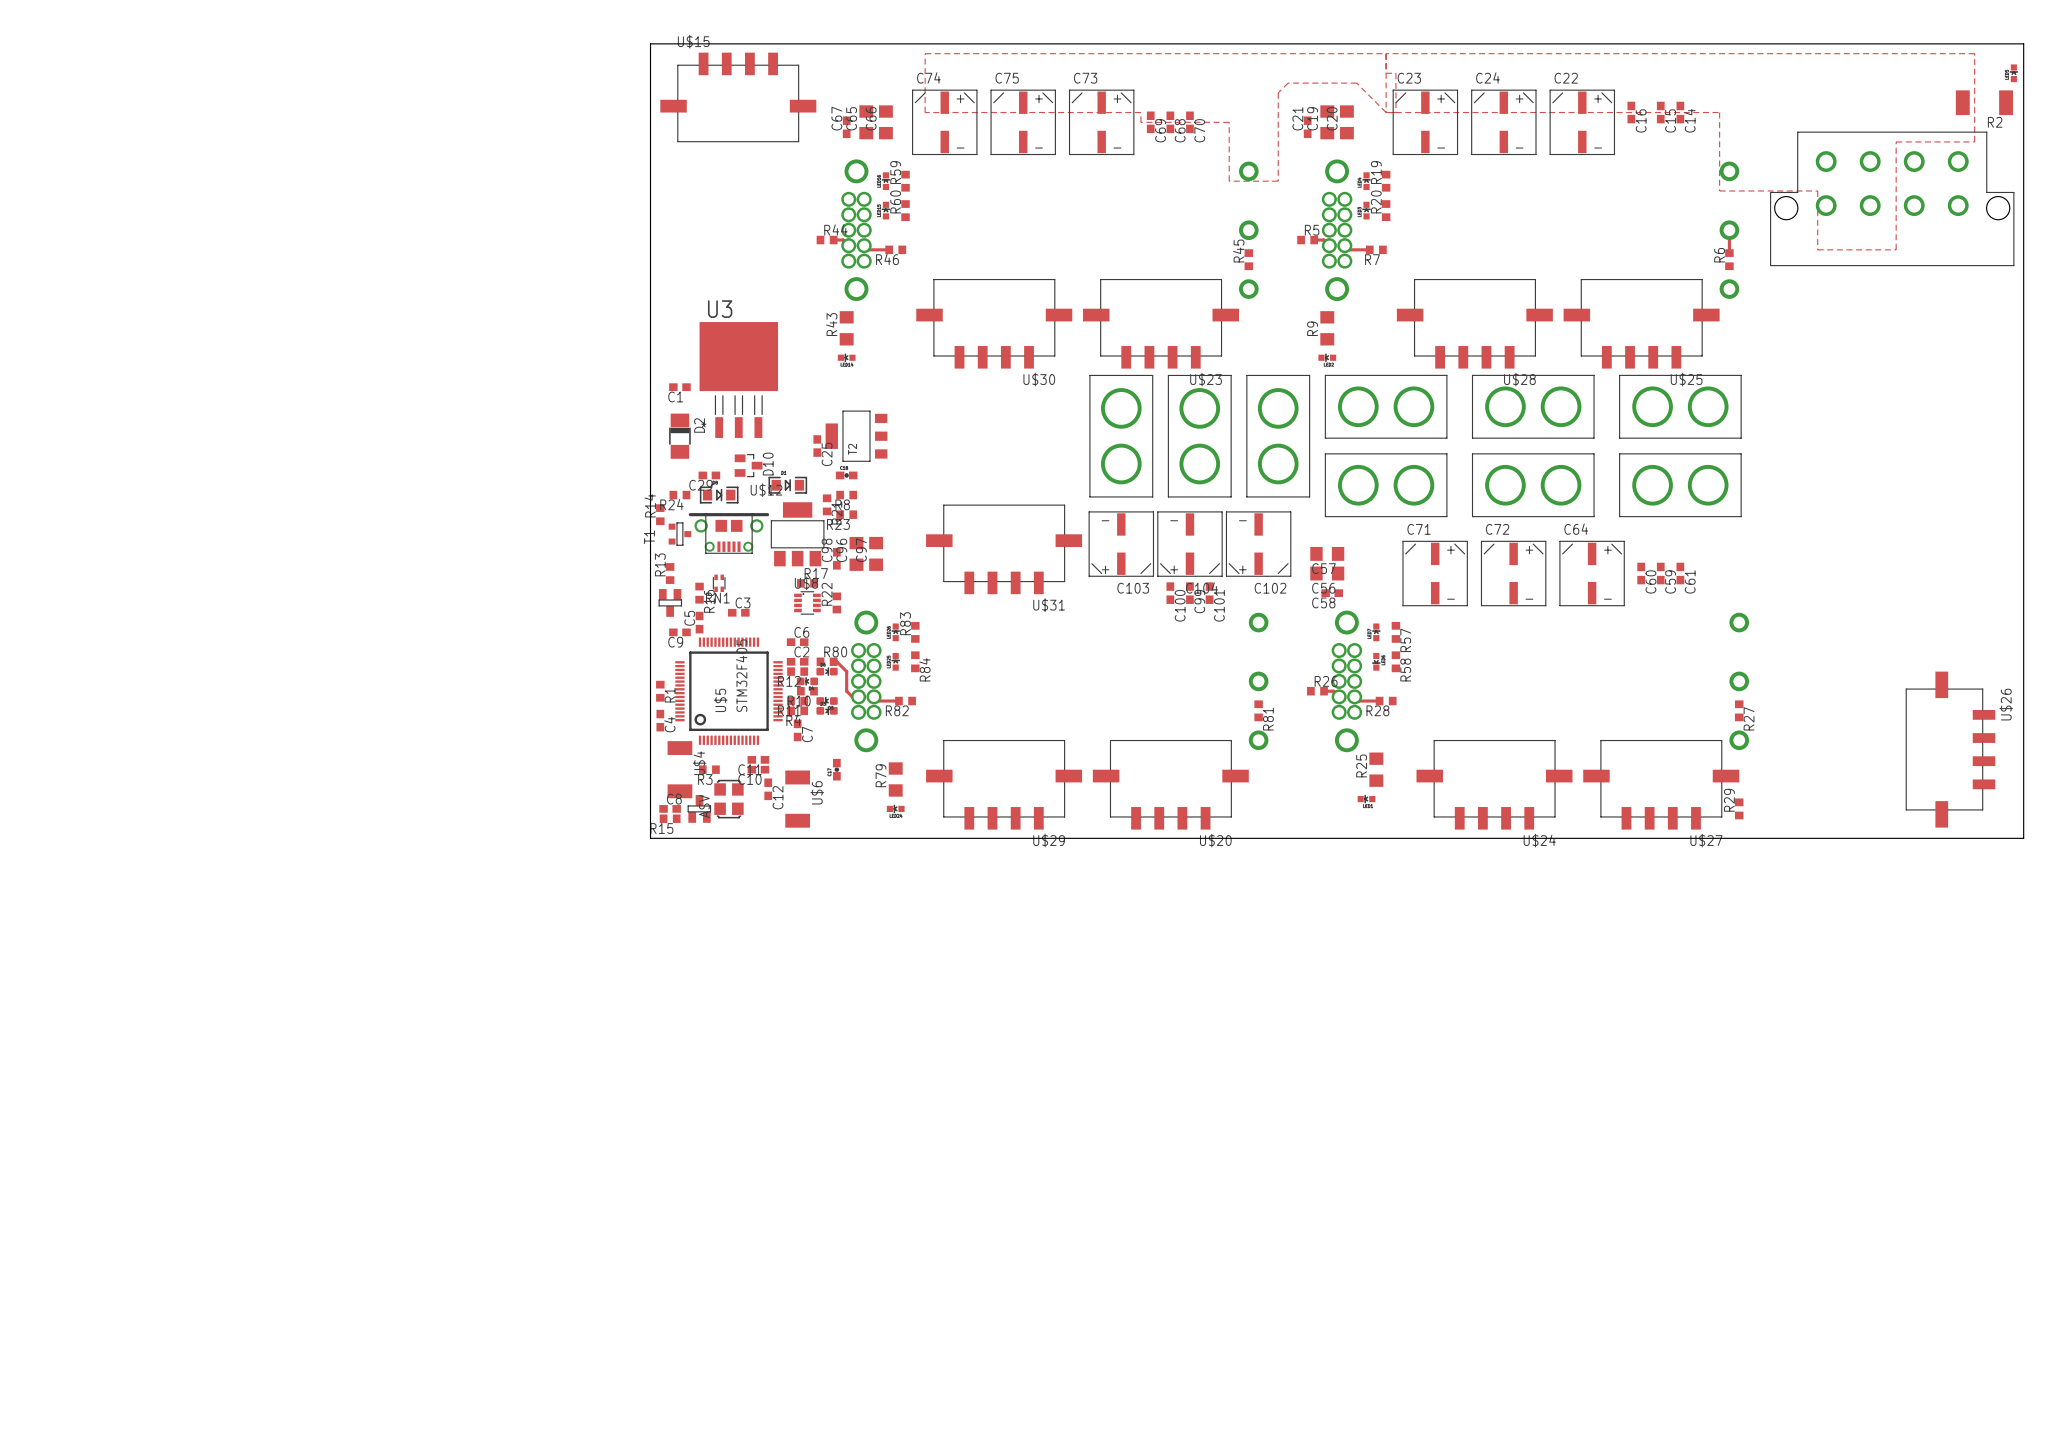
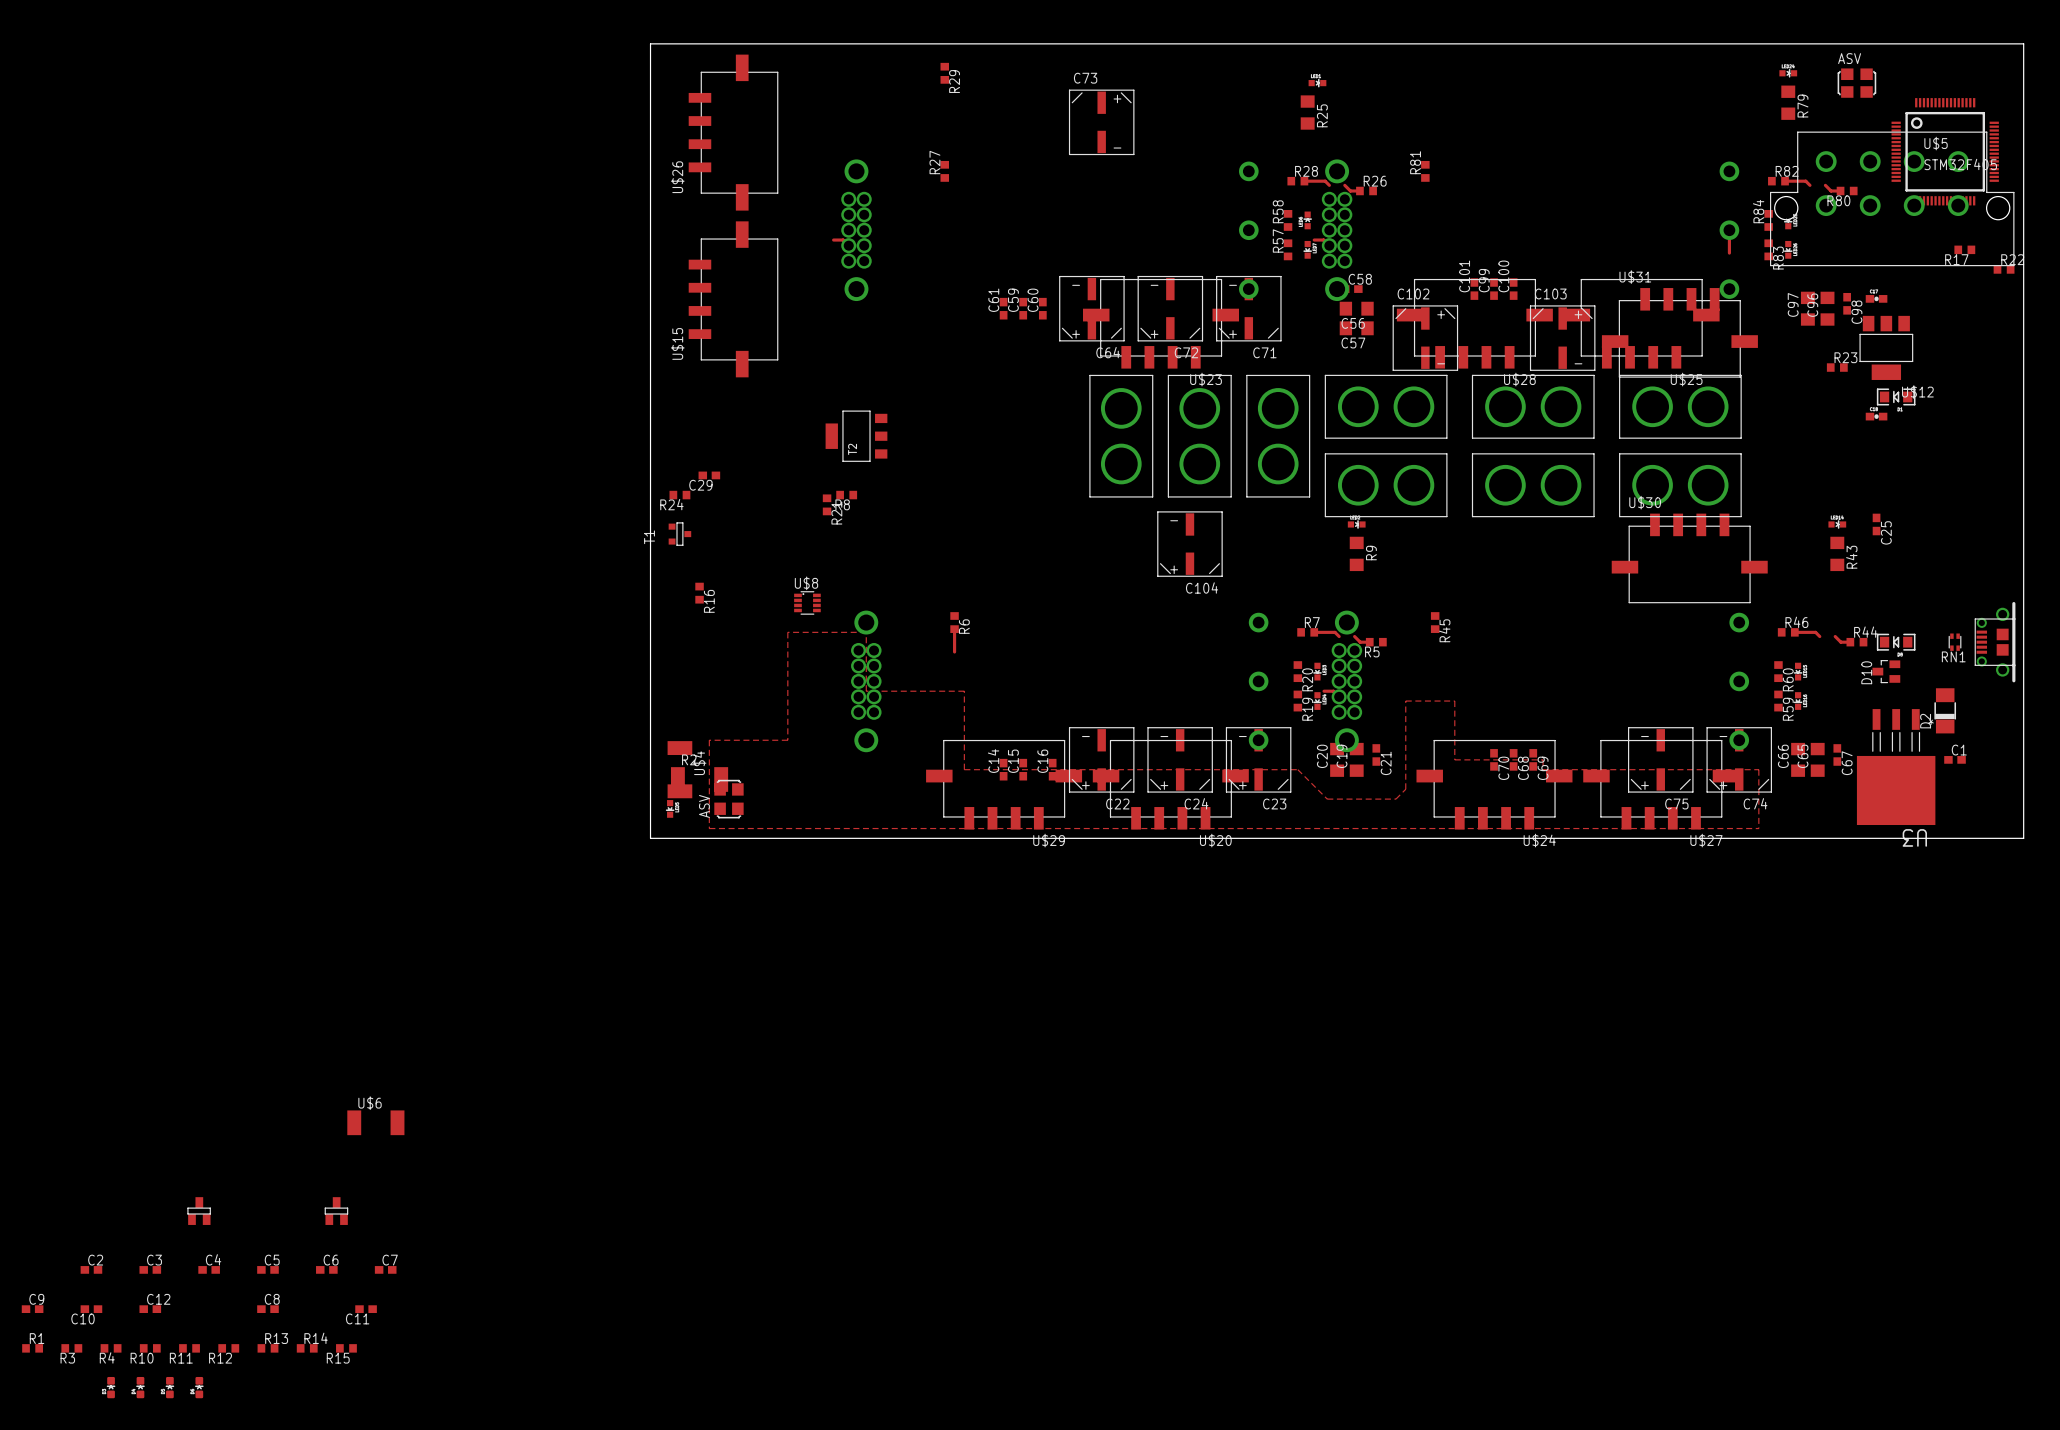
zone outline: (1386, 53) (1386, 112) -> none
zone outline: (1386, 73) (1395, 73) (1395, 112) -> none
part rotation: 0° (2013, 73) -> 180° (670, 808)
part position: (2013, 73) -> (670, 808)
C74 name position: C74 (928, 77) -> C74 (1755, 803)
C24 name position: C24 (1487, 77) -> C24 (1196, 803)
C75 name position: C75 (1007, 78) -> C75 (1676, 804)
C23 name position: C23 (1409, 78) -> C23 (1274, 804)
C22 name position: C22 (1566, 78) -> C22 (1117, 804)
ASV: none -> (1856, 83)
C74 footprint: [912, 89, 978, 156] -> [1706, 727, 1772, 793]
C75 footprint: [990, 89, 1056, 156] -> [1628, 727, 1694, 793]
C23 footprint: [1392, 89, 1459, 156] -> [1225, 727, 1292, 793]
C24 footprint: [1471, 89, 1537, 156] -> [1147, 727, 1213, 793]
C22 footprint: [1549, 89, 1615, 156] -> [1069, 727, 1135, 793]
U$15 rotation: 0° (738, 97) -> 90° counterclockwise (733, 299)
U$15 position: (738, 97) -> (733, 299)
R2 position: (1984, 102) -> (699, 779)
zone outline: (1386, 112) (1719, 112) (1719, 190) (1817, 190) (1817, 249) (1896, 249) (1896, 141) (1974, 141) (1974, 53) (925, 53) (925, 112) (1140, 112) (1140, 122) (1229, 122) (1229, 181) (1278, 181) (1278, 92) (1288, 83) (1356, 83) (1386, 112) -> none
C16 position: (1631, 112) -> (1052, 769)
C15 position: (1660, 112) -> (1023, 769)
C14 position: (1680, 112) -> (1003, 769)
C67 name position: C67 (836, 118) -> C67 (1847, 763)
C21 name position: C21 (1297, 118) -> C21 (1386, 763)
C16 name position: C16 (1641, 120) -> C16 (1042, 761)
C15 name position: C15 (1670, 120) -> C15 (1013, 761)
C14 name position: C14 (1689, 120) -> C14 (993, 761)
C65 position: (866, 122) -> (1817, 759)
C66 position: (885, 122) -> (1798, 759)
C69 position: (1150, 122) -> (1533, 759)
C68 position: (1170, 122) -> (1513, 759)
C70 position: (1189, 122) -> (1494, 759)
C19 position: (1327, 122) -> (1356, 759)
C20 position: (1346, 122) -> (1337, 759)
R2 name position: R2 (1995, 122) -> R2 (689, 759)
C67 position: (846, 127) -> (1837, 754)
C21 position: (1307, 127) -> (1376, 754)
R59 name position: R59 (895, 172) -> R59 (1788, 709)
R19 name position: R19 (1376, 172) -> R19 (1307, 709)
part rotation: 0° (885, 181) -> 180° (1798, 701)
part position: (885, 181) -> (1798, 701)
R59 position: (905, 181) -> (1778, 701)
track: none -> (1304, 181) (1325, 181) (1329, 185)
part rotation: 0° (1366, 181) -> 180° (1317, 701)
part position: (1366, 181) -> (1317, 701)
R19 position: (1386, 181) -> (1297, 701)
track: none -> (1785, 181) (1805, 181) (1809, 185)
track: none -> (1344, 185) (1350, 190) (1359, 190)
track: none -> (1825, 185) (1831, 190) (1840, 190)
R60 name position: R60 (895, 201) -> R60 (1788, 679)
R20 name position: R20 (1376, 201) -> R20 (1307, 679)
part rotation: 0° (885, 210) -> 180° (1798, 671)
part position: (885, 210) -> (1798, 671)
R60 position: (905, 210) -> (1778, 671)
part rotation: 0° (1366, 210) -> 180° (1317, 671)
part position: (1366, 210) -> (1317, 671)
R20 position: (1386, 210) -> (1297, 671)
R5 name position: R5 (1312, 230) -> R5 (1372, 651)
R44 position: (827, 240) -> (1856, 642)
R5 position: (1307, 240) -> (1376, 642)
track: (864, 245) (868, 249) (889, 249) -> none
track: (1344, 245) (1348, 249) (1369, 249) -> none
R46 position: (895, 249) -> (1788, 632)
R7 position: (1376, 249) -> (1307, 632)
R45 name position: R45 (1238, 251) -> R45 (1444, 630)
R6 name position: R6 (1719, 255) -> R6 (964, 626)
R46 name position: R46 (887, 259) -> R46 (1796, 622)
R45 position: (1248, 259) -> (1435, 622)
R7 name position: R7 (1372, 259) -> R7 (1312, 622)
R6 position: (1729, 259) -> (954, 622)
U$30 rotation: 0° (994, 323) -> 180° (1689, 558)
U$30 position: (994, 323) -> (1689, 558)
R43 name position: R43 (831, 324) -> R43 (1851, 557)
R43 position: (846, 328) -> (1837, 553)
R9 name position: R9 (1312, 328) -> R9 (1371, 553)
R9 position: (1327, 328) -> (1356, 553)
part rotation: 0° (846, 357) -> 180° (1837, 524)
part position: (846, 357) -> (1837, 524)
part rotation: 0° (1327, 357) -> 180° (1356, 524)
part position: (1327, 357) -> (1356, 524)
U3 rotation: 0° (738, 380) -> 180° (1896, 767)
U3 position: (738, 380) -> (1896, 767)
C1 position: (679, 387) -> (1955, 759)
C1 name position: C1 (675, 396) -> C1 (1959, 750)
D2 rotation: 0° (679, 436) -> 180° (1945, 710)
D2 position: (679, 436) -> (1945, 710)
C25 position: (817, 446) -> (1876, 524)
D10 rotation: 0° (748, 465) -> 180° (1886, 671)
D10 position: (748, 465) -> (1886, 671)
part position: (846, 475) -> (1876, 416)
part rotation: 0° (787, 485) -> 180° (1896, 396)
part position: (787, 485) -> (1896, 396)
part rotation: 0° (719, 495) -> 180° (1896, 642)
part position: (719, 495) -> (1896, 642)
C103 footprint: [1088, 511, 1154, 577] -> [1530, 305, 1596, 371]
C102 footprint: [1225, 511, 1292, 577] -> [1392, 305, 1459, 371]
R14 rotation: 0° (660, 514) -> 90° clockwise (307, 1348)
R14 position: (660, 514) -> (307, 1348)
R23 position: (846, 514) -> (1837, 367)
R23 name position: R23 (838, 524) -> R23 (1845, 357)
C71 name position: C71 (1419, 529) -> C71 (1264, 352)
C72 name position: C72 (1497, 529) -> C72 (1186, 352)
C64 name position: C64 (1576, 529) -> C64 (1108, 352)
part: (728, 533) -> none
U$12 rotation: 0° (797, 534) -> 180° (1886, 347)
U$12 position: (797, 534) -> (1886, 347)
C71 footprint: [1402, 540, 1468, 607] -> [1216, 276, 1282, 342]
C72 footprint: [1480, 540, 1547, 607] -> [1137, 276, 1204, 342]
C64 footprint: [1559, 540, 1625, 607] -> [1059, 276, 1125, 342]
U$31 rotation: 0° (1004, 549) -> 180° (1679, 332)
U$31 position: (1004, 549) -> (1679, 332)
C98 name position: C98 (827, 550) -> C98 (1856, 312)
C96 position: (856, 553) -> (1827, 308)
C97 position: (876, 553) -> (1807, 308)
C57 position: (1327, 553) -> (1356, 328)
C98 position: (836, 558) -> (1847, 303)
R13 rotation: 0° (670, 573) -> 90° clockwise (267, 1348)
R13 position: (670, 573) -> (267, 1348)
R17 name position: R17 (816, 573) -> R17 (1956, 259)
C56 position: (1327, 573) -> (1356, 308)
C60 position: (1641, 573) -> (1042, 308)
C59 position: (1660, 573) -> (1023, 308)
C61 position: (1680, 573) -> (1003, 308)
C60 name position: C60 (1650, 581) -> C60 (1033, 300)
C59 name position: C59 (1670, 581) -> C59 (1013, 300)
C61 name position: C61 (1690, 581) -> C61 (993, 300)
RN1 position: (719, 583) -> (1955, 642)
R17 position: (807, 583) -> (1964, 249)
C103 name position: C103 (1133, 588) -> C103 (1550, 293)
C102 name position: C102 (1270, 588) -> C102 (1413, 293)
C100 position: (1170, 593) -> (1513, 289)
C99 position: (1189, 593) -> (1494, 289)
C101 position: (1209, 593) -> (1474, 289)
C58 position: (1332, 593) -> (1351, 289)
C99 name position: C99 (1199, 601) -> C99 (1484, 280)
part: (670, 602) -> none
R22 rotation: 0° (836, 602) -> 90° clockwise (2004, 269)
R22 position: (836, 602) -> (2004, 269)
C58 name position: C58 (1323, 602) -> C58 (1360, 279)
C100 name position: C100 (1180, 605) -> C100 (1503, 276)
C101 name position: C101 (1219, 605) -> C101 (1464, 276)
C3 position: (738, 612) -> (150, 1269)
C5 rotation: 0° (699, 622) -> 90° clockwise (267, 1269)
C5 position: (699, 622) -> (267, 1269)
R83 name position: R83 (905, 623) -> R83 (1778, 258)
track: none -> (954, 629) (954, 651)
C9 position: (679, 632) -> (32, 1309)
zone outline: none -> (787, 632) (787, 740) (709, 740) (709, 828) (1758, 828) (1758, 769) (1543, 769) (1543, 759) (1454, 759) (1454, 701) (1405, 701) (1405, 789) (1395, 799) (1327, 799) (1297, 769) (964, 769) (964, 691) (866, 691) (866, 632) (787, 632)
part rotation: 0° (895, 632) -> 180° (1788, 249)
part position: (895, 632) -> (1788, 249)
R83 position: (915, 632) -> (1768, 249)
track: none -> (1314, 632) (1335, 632) (1339, 636)
part rotation: 0° (1376, 632) -> 180° (1307, 249)
part position: (1376, 632) -> (1307, 249)
R57 position: (1395, 632) -> (1288, 249)
track: none -> (1794, 632) (1815, 632) (1819, 636)
track: none -> (1354, 636) (1360, 642) (1369, 642)
track: none -> (1835, 636) (1840, 642) (1850, 642)
R57 name position: R57 (1405, 640) -> R57 (1278, 240)
C9 name position: C9 (675, 642) -> C9 (36, 1299)
C6 position: (797, 642) -> (326, 1269)
part: none -> (1995, 642)
R80 name position: R80 (835, 651) -> R80 (1838, 200)
C2 position: (797, 661) -> (91, 1269)
R80 position: (827, 661) -> (1847, 190)
track: (833, 661) (836, 661) (846, 671) (846, 691) (852, 696) (858, 696) -> none
part rotation: 0° (895, 661) -> 180° (1788, 220)
part position: (895, 661) -> (1788, 220)
R84 position: (915, 661) -> (1768, 220)
part rotation: 0° (1376, 661) -> 180° (1307, 220)
part position: (1376, 661) -> (1307, 220)
R58 position: (1395, 661) -> (1288, 220)
R84 name position: R84 (924, 669) -> R84 (1758, 211)
R58 name position: R58 (1405, 670) -> R58 (1278, 211)
R12 position: (797, 671) -> (228, 1348)
part rotation: 0° (827, 671) -> 90° counterclockwise (199, 1387)
part position: (827, 671) -> (199, 1387)
part rotation: 0° (807, 681) -> 90° clockwise (140, 1387)
part position: (807, 681) -> (140, 1387)
R1 rotation: 0° (660, 691) -> 90° clockwise (32, 1348)
R1 position: (660, 691) -> (32, 1348)
U$5 rotation: 0° (728, 691) -> 90° clockwise (1945, 151)
U$5 position: (728, 691) -> (1945, 151)
R10 position: (807, 691) -> (150, 1348)
R26 position: (1317, 691) -> (1366, 190)
R1 name position: R1 (670, 695) -> R1 (37, 1338)
track: (874, 696) (878, 701) (898, 701) -> none
track: (1354, 696) (1358, 701) (1379, 701) -> none
R11 position: (797, 701) -> (189, 1348)
part rotation: 0° (827, 701) -> 90° clockwise (169, 1387)
part position: (827, 701) -> (169, 1387)
R82 position: (905, 701) -> (1778, 181)
R28 position: (1386, 701) -> (1297, 181)
R4 position: (797, 710) -> (111, 1348)
part rotation: 0° (827, 710) -> 90° counterclockwise (111, 1387)
part position: (827, 710) -> (111, 1387)
R82 name position: R82 (897, 710) -> R82 (1787, 171)
R81 position: (1258, 710) -> (1425, 171)
R28 name position: R28 (1377, 710) -> R28 (1306, 171)
R27 position: (1739, 710) -> (944, 171)
R27 name position: R27 (1749, 718) -> R27 (934, 162)
R81 name position: R81 (1268, 719) -> R81 (1415, 162)
C4 rotation: 0° (660, 720) -> 90° clockwise (209, 1269)
C4 position: (660, 720) -> (209, 1269)
C4 name position: C4 (669, 724) -> C4 (213, 1259)
C7 rotation: 0° (797, 730) -> 90° clockwise (385, 1269)
C7 position: (797, 730) -> (385, 1269)
C7 name position: C7 (807, 734) -> C7 (390, 1260)
U$26 rotation: 0° (1950, 749) -> 180° (733, 132)
U$26 position: (1950, 749) -> (733, 132)
C11 position: (758, 759) -> (366, 1309)
R25 name position: R25 (1361, 765) -> R25 (1322, 115)
R3 position: (709, 769) -> (71, 1348)
C10 position: (758, 769) -> (91, 1309)
part rotation: 0° (836, 769) -> 90° clockwise (1876, 298)
part position: (836, 769) -> (1876, 298)
R25 position: (1376, 769) -> (1307, 112)
R79 name position: R79 (881, 775) -> R79 (1802, 106)
R79 position: (895, 779) -> (1788, 102)
C12 rotation: 0° (768, 789) -> 90° clockwise (150, 1309)
C12 position: (768, 789) -> (150, 1309)
U$6 name position: U$6 (817, 792) -> U$6 (370, 1103)
C12 name position: C12 (778, 797) -> C12 (158, 1299)
U$6 rotation: 0° (797, 799) -> 90° clockwise (375, 1122)
U$6 position: (797, 799) -> (375, 1122)
part rotation: 0° (1366, 799) -> 180° (1317, 83)
part position: (1366, 799) -> (1317, 83)
R29 name position: R29 (1729, 800) -> R29 (954, 81)
C8 position: (670, 808) -> (267, 1309)
part: (699, 808) -> none
part rotation: 0° (895, 808) -> 180° (1788, 73)
part position: (895, 808) -> (1788, 73)
R29 position: (1739, 808) -> (944, 73)
R15 position: (670, 818) -> (346, 1348)
part: none -> (199, 1211)
part: none -> (336, 1211)

